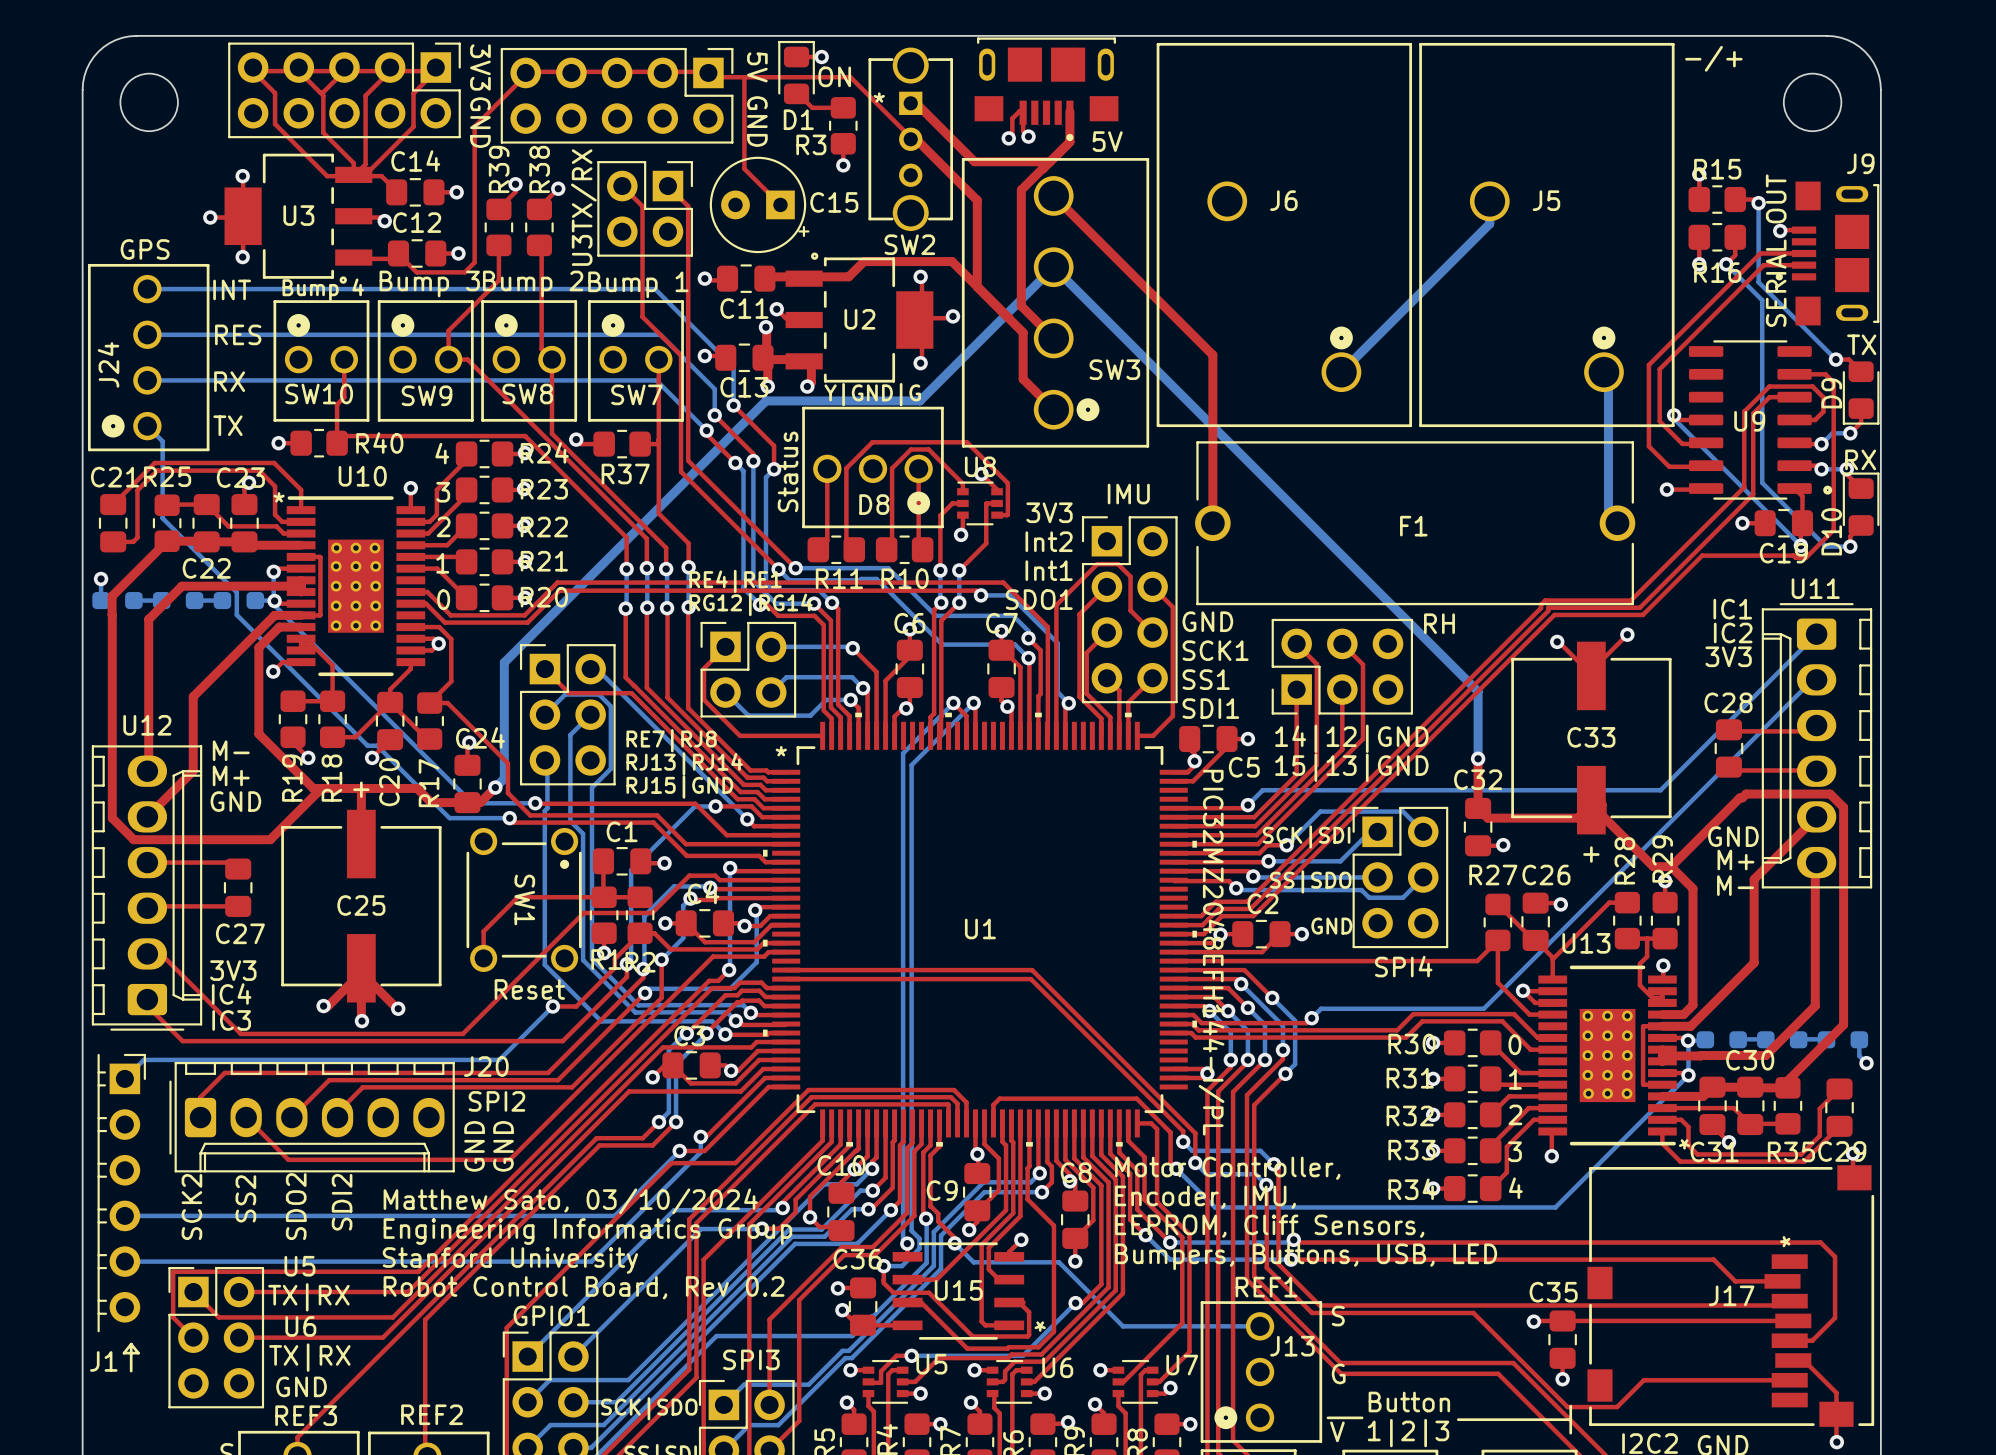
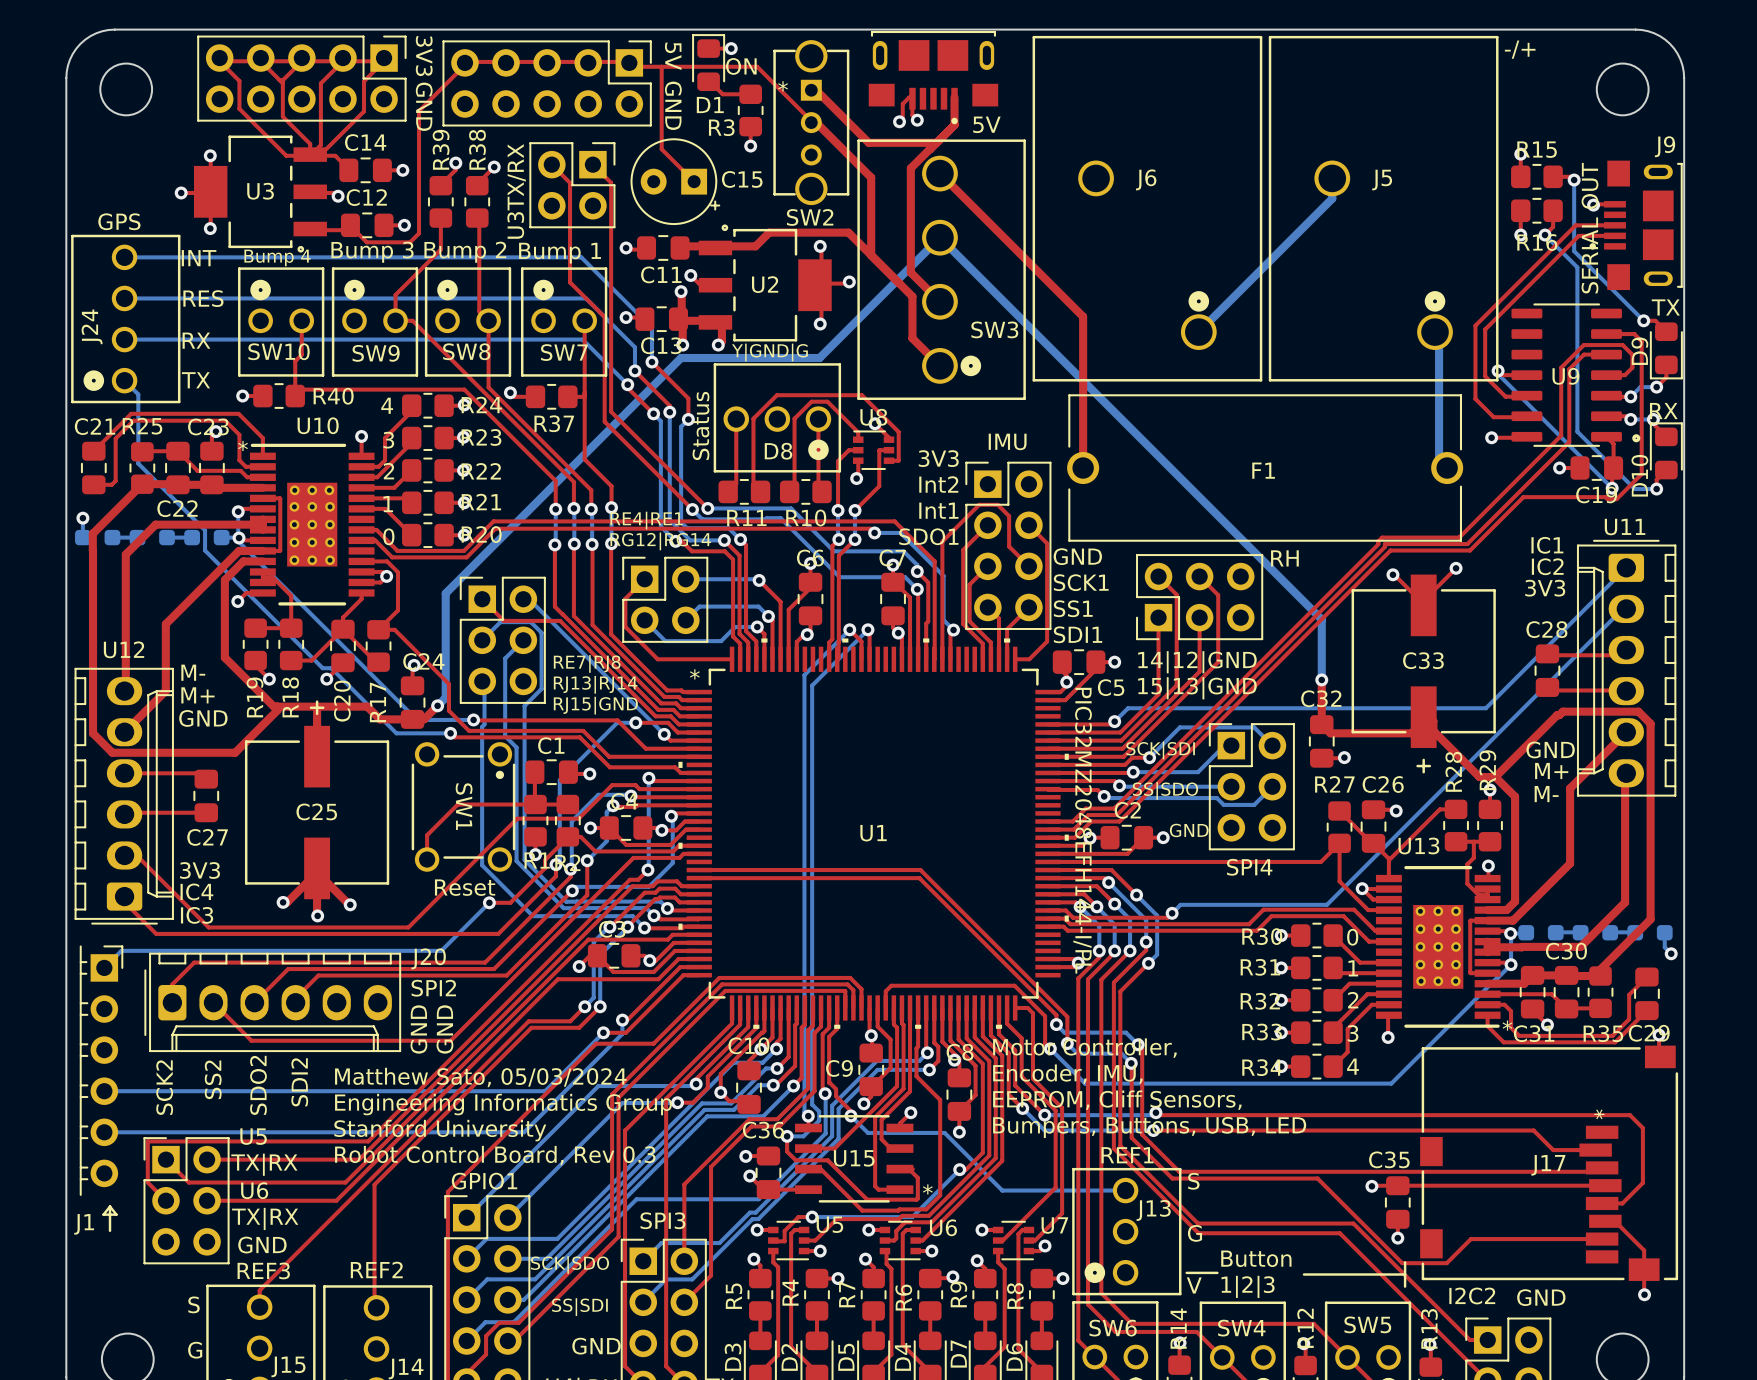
text: Matthew Sato, 03/10/2024 (570, 1201) -> Matthew Sato, 05/03/2024 (480, 1077)
text: Robot Control Board, Rev 0.2 (584, 1287) -> Robot Control Board, Rev 0.3 (495, 1155)

